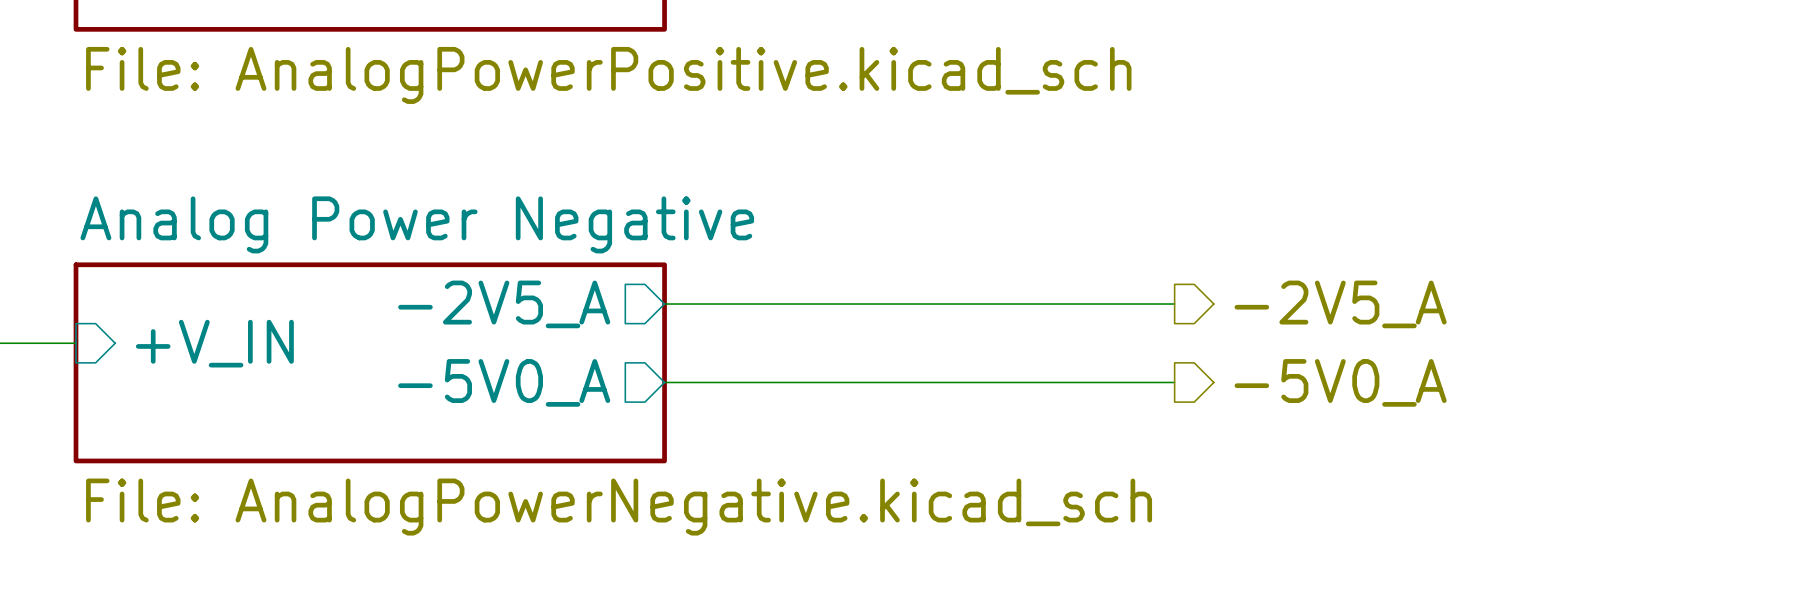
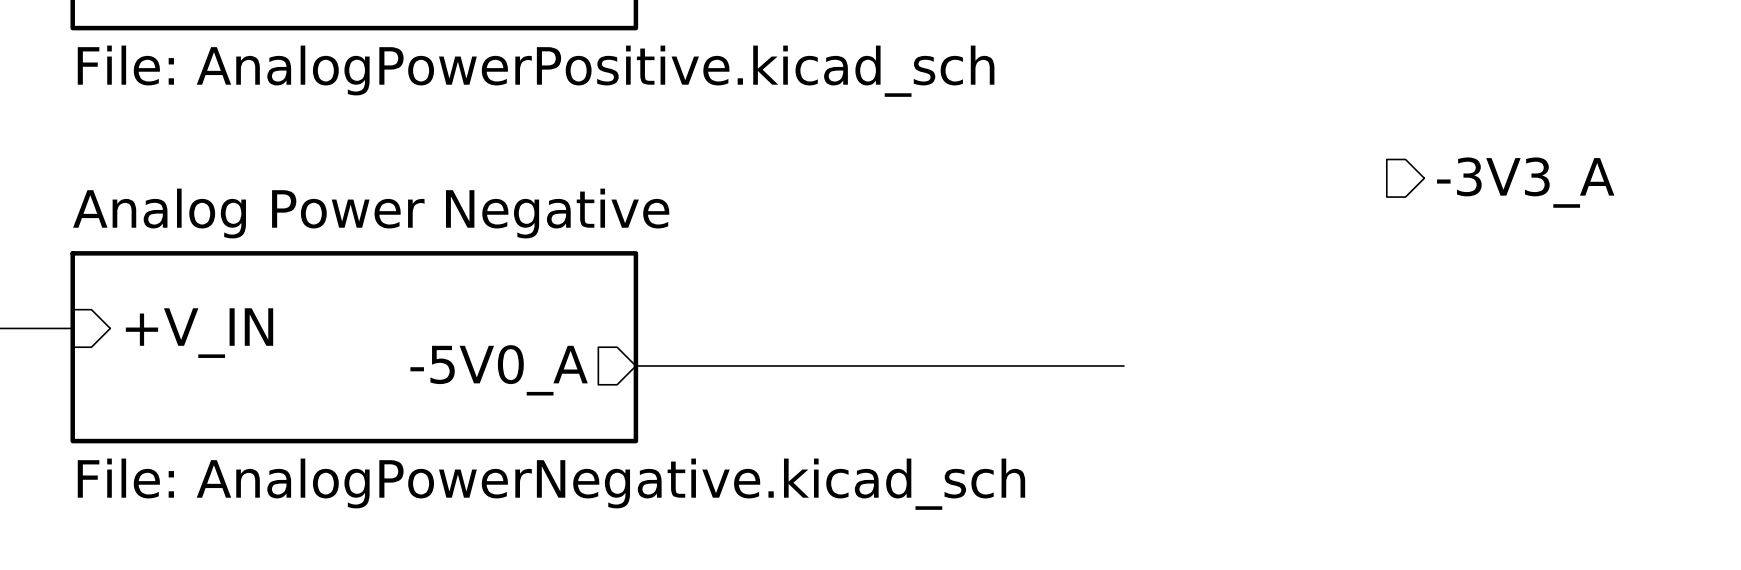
hierarchical label: none -> -3V3_A (1525, 182)
sheet pin: -2V5_A (504, 304) -> none
wire: (664, 304) (1174, 304) -> none
hierarchical label: -2V5_A (1340, 304) -> none
hierarchical label: -5V0_A (1340, 382) -> none

